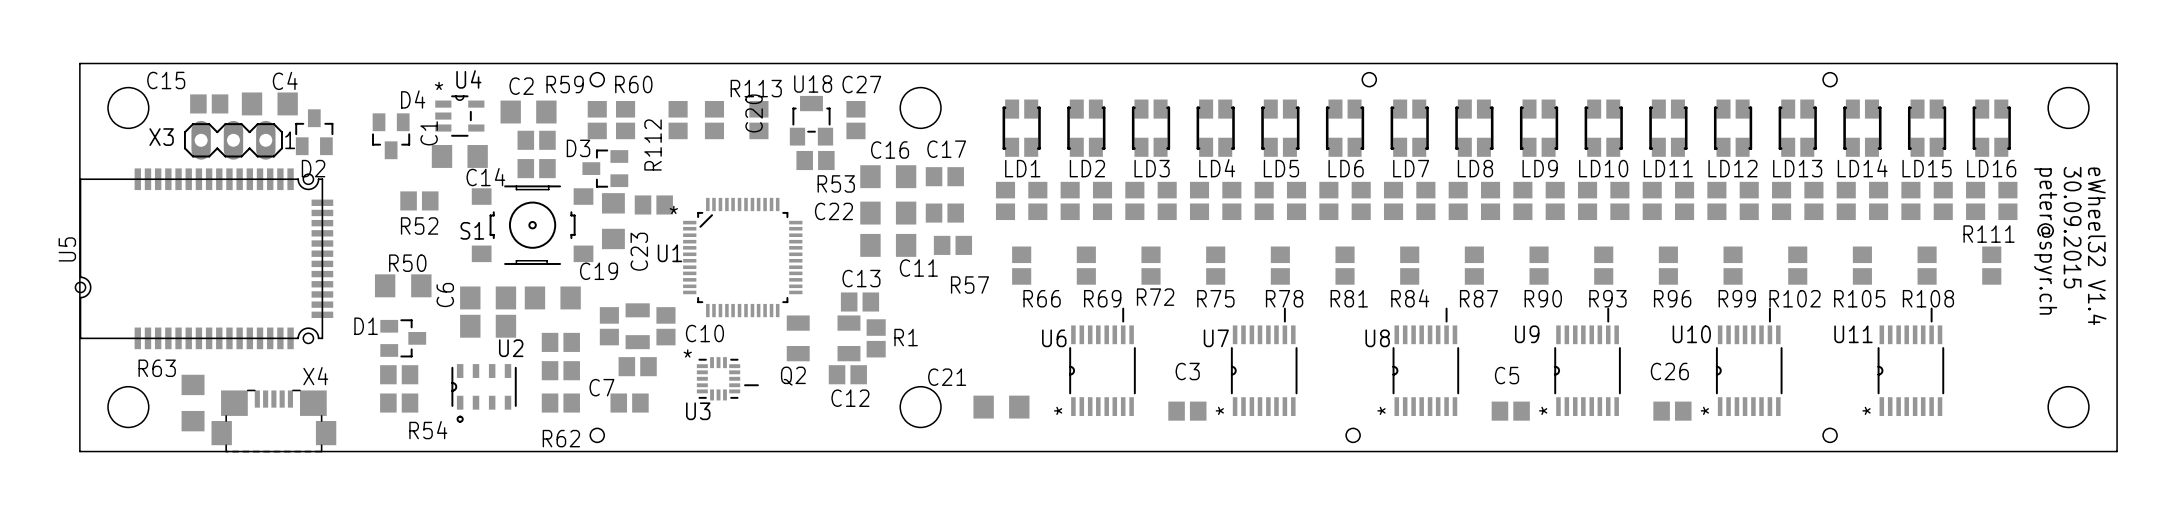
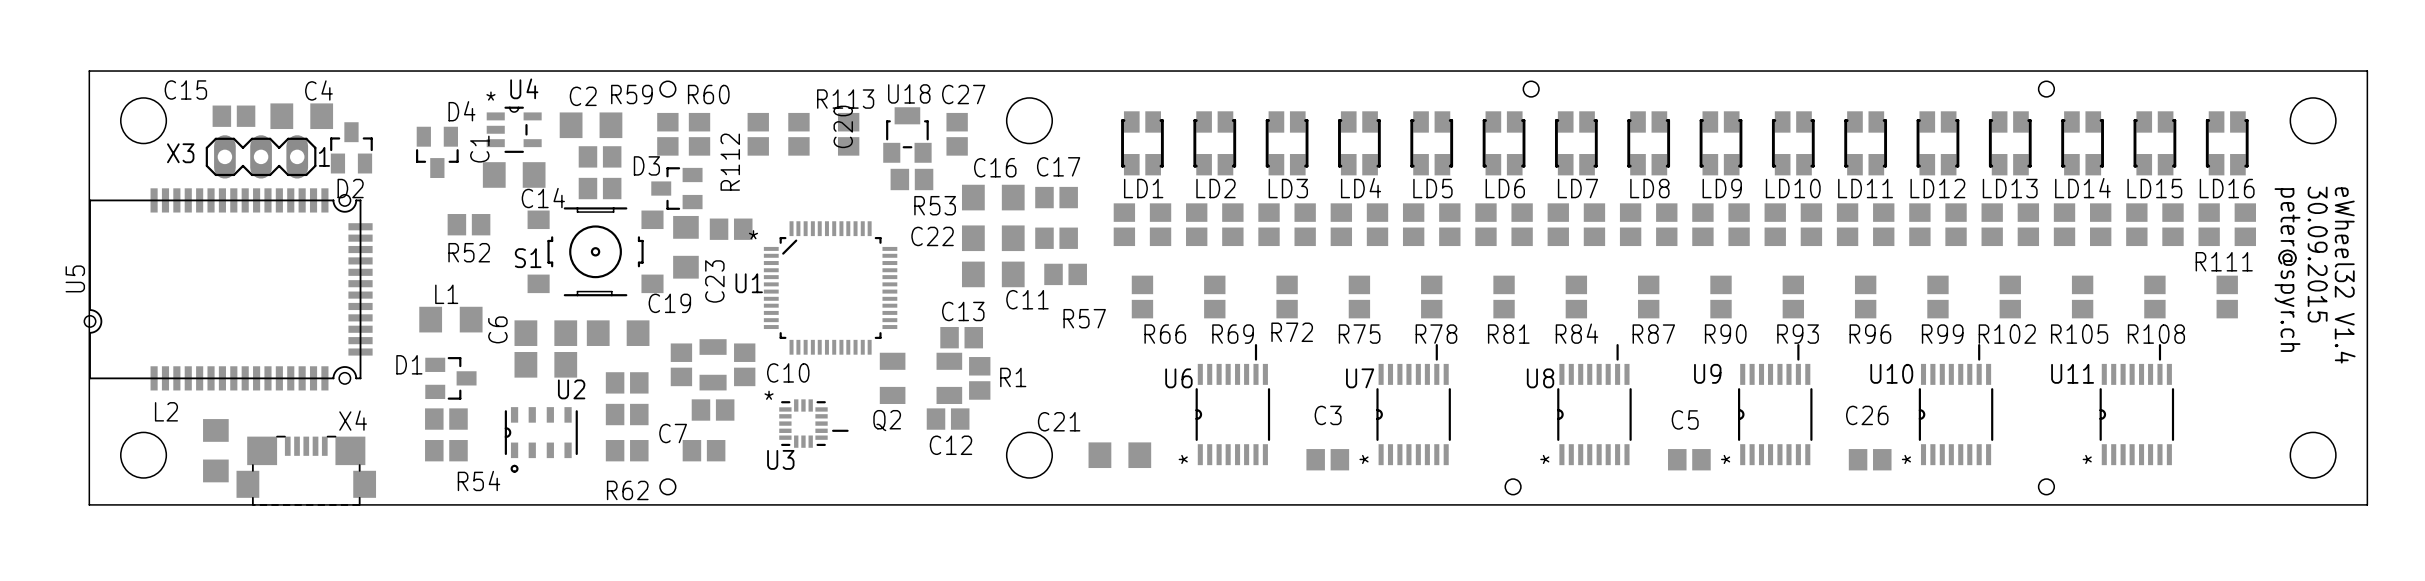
R50 name: R50 (407, 263) -> L1 (446, 294)
R63 name: R63 (157, 368) -> L2 (166, 411)

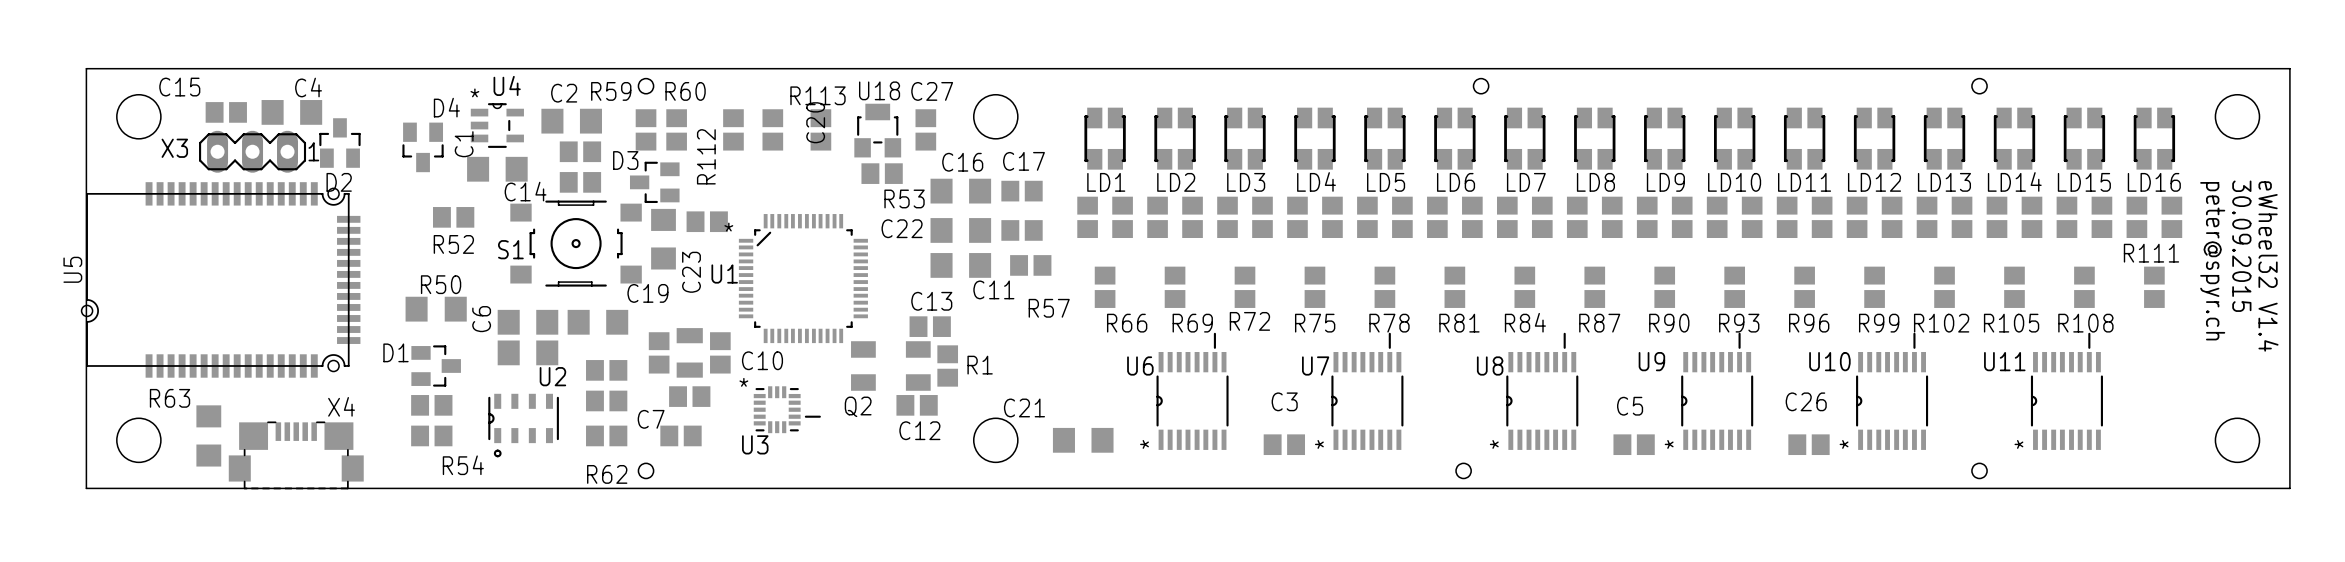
L1 name: L1 (446, 294) -> R50 (441, 284)
L2 name: L2 (166, 411) -> R63 (170, 398)

